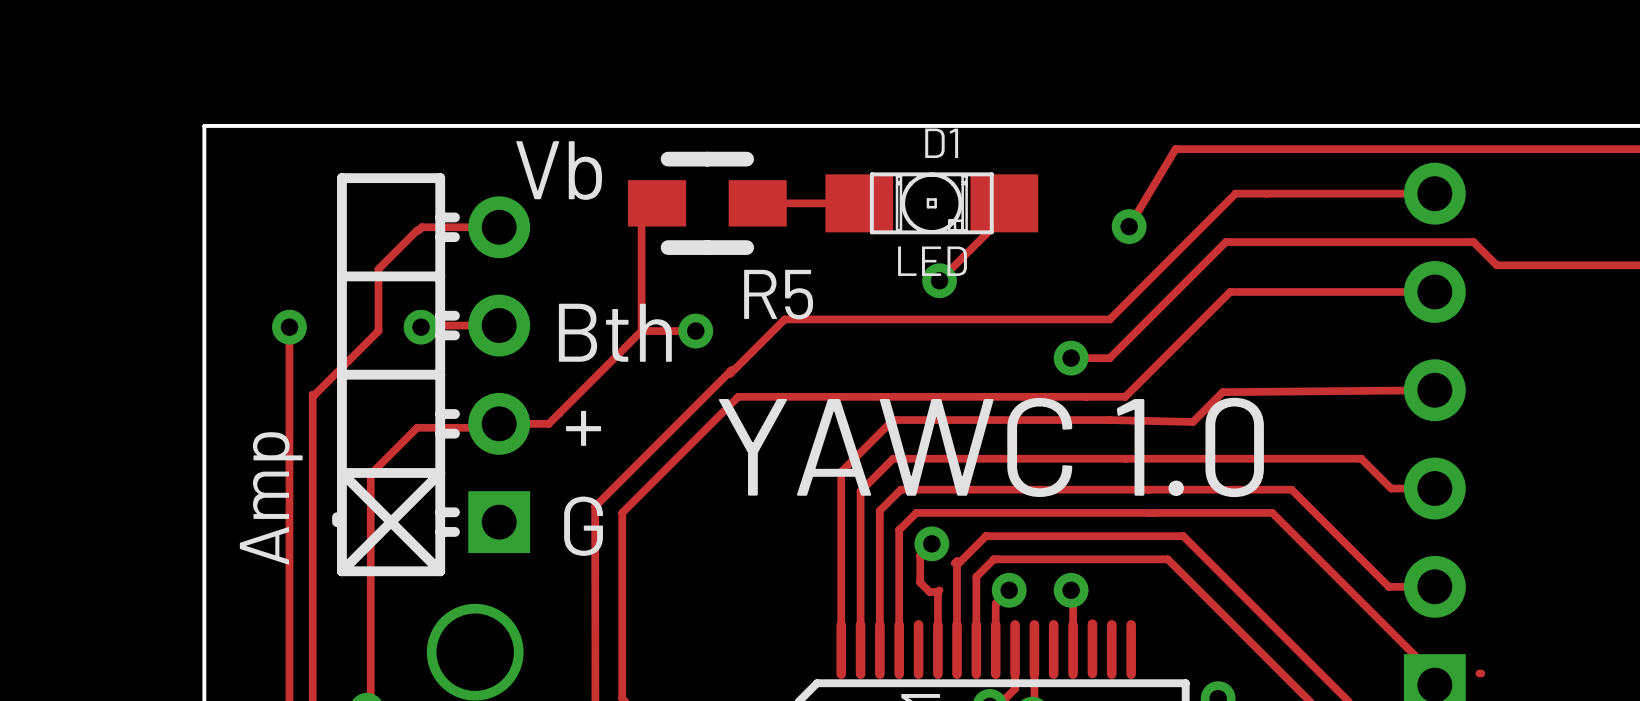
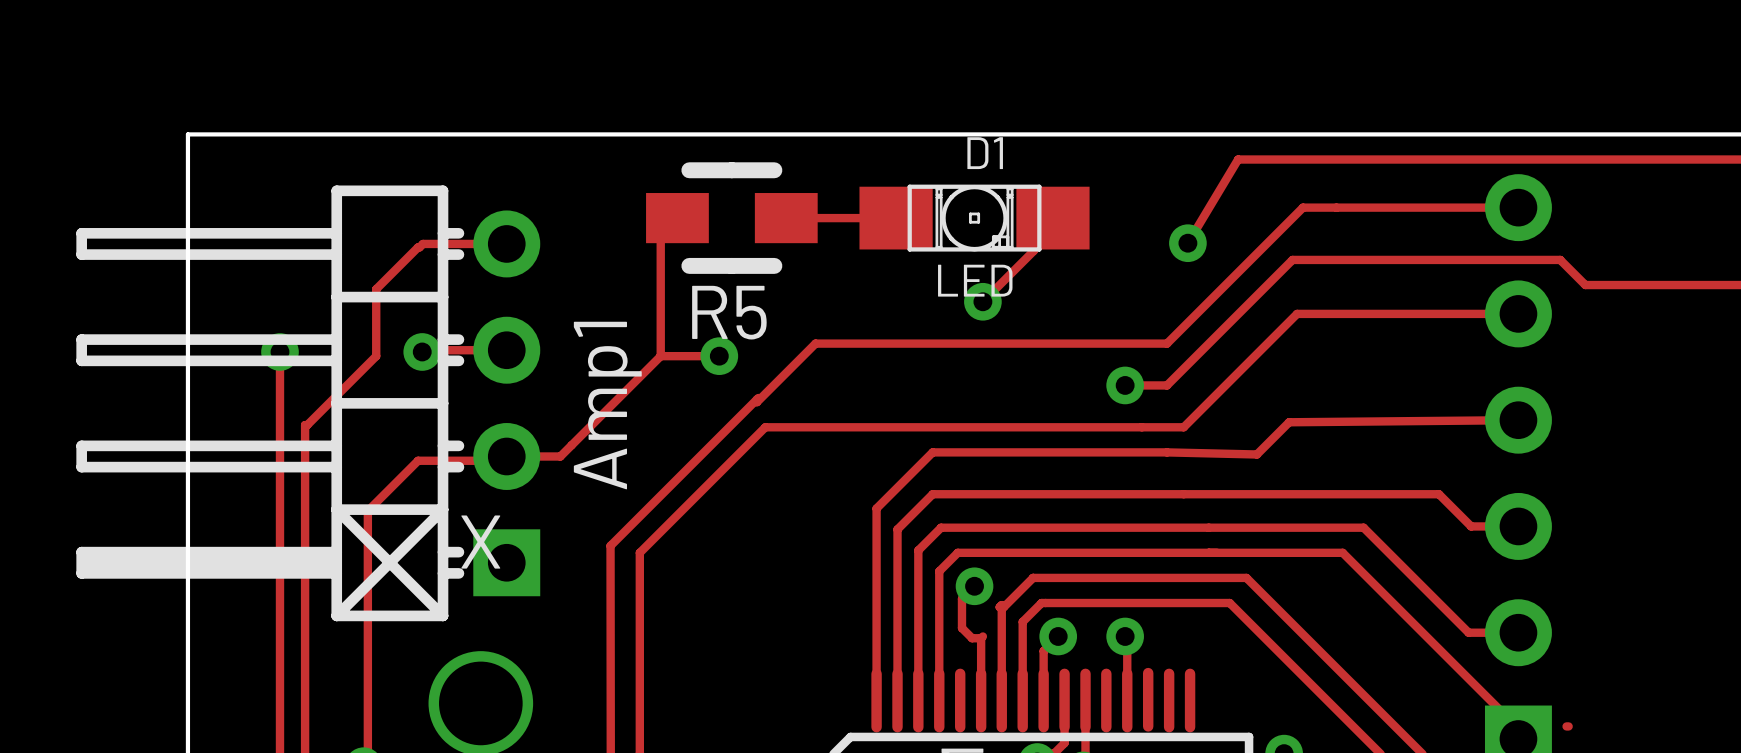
text: Vb (559, 170) -> none
R5 name position: R5 (778, 294) -> R5 (729, 312)
text: Bth (615, 332) -> none
Amp1: none -> (308, 403)
Amp: (431, 374) -> none
text: + (583, 428) -> none
text: YAWC 1.0 (991, 447) -> none
X name: none -> X (480, 542)
text: G (583, 526) -> none

